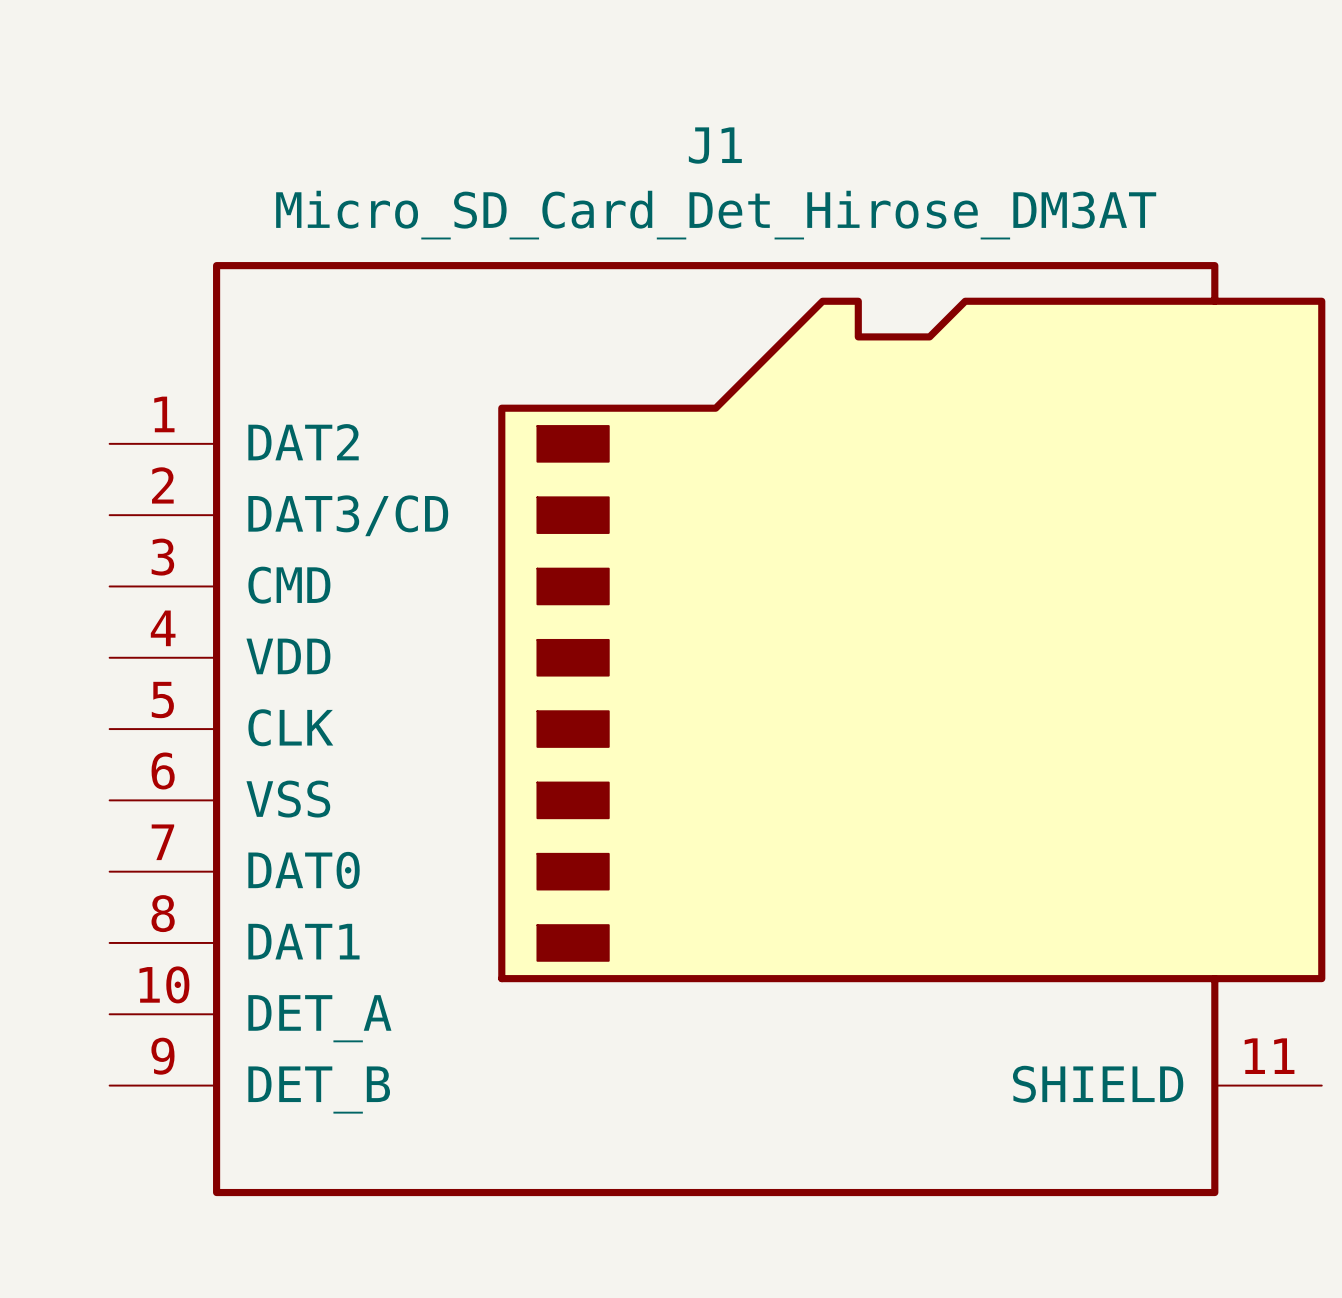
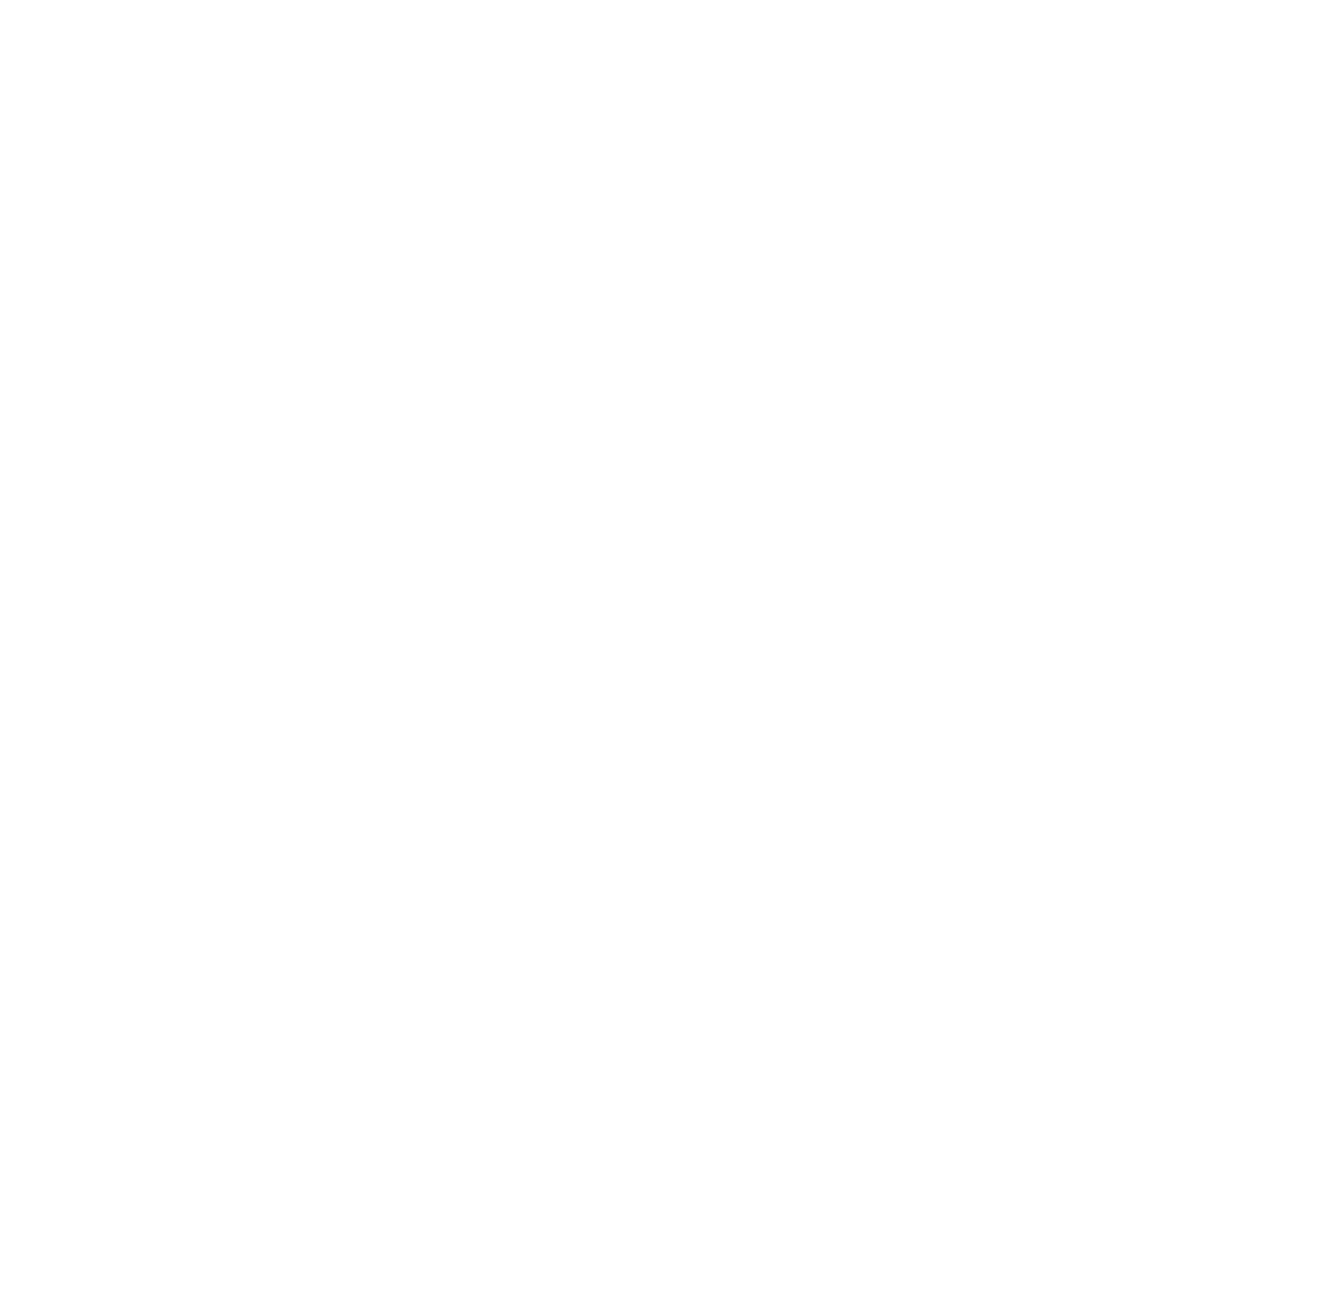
J1: Micro_SD_Card_Det_Hirose_DM3AT (717, 729) -> none

